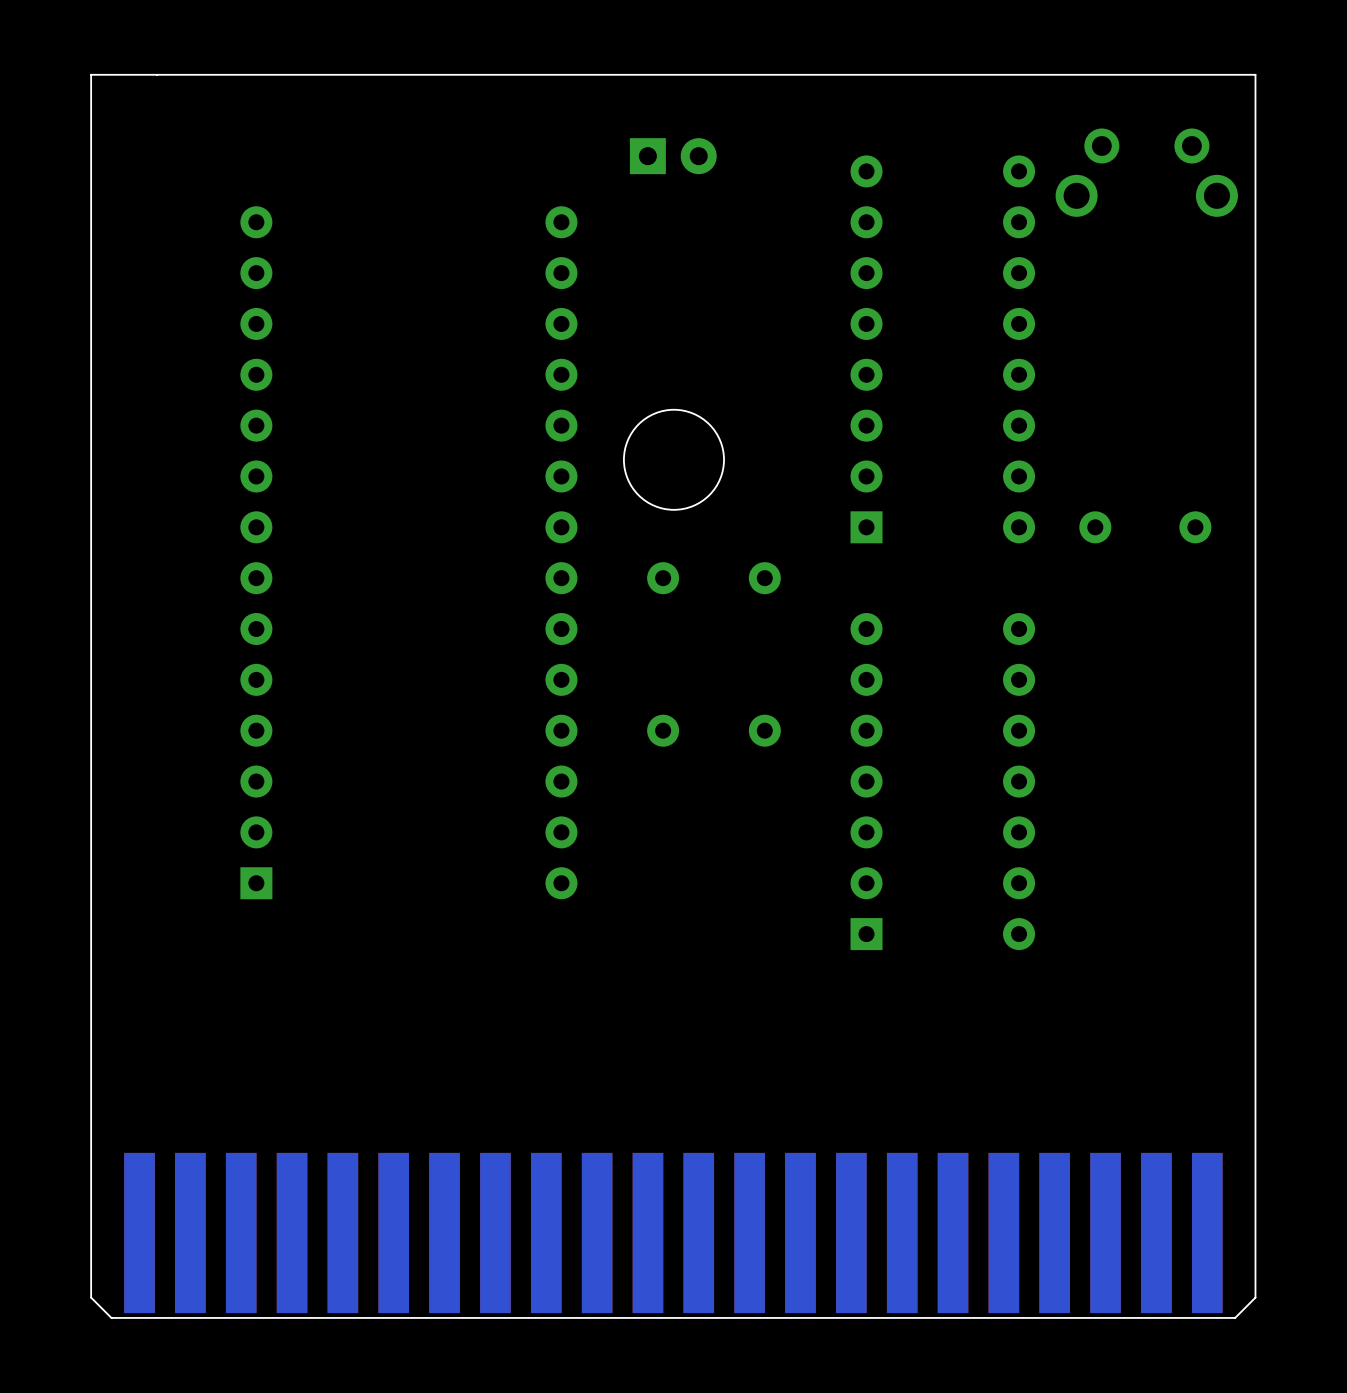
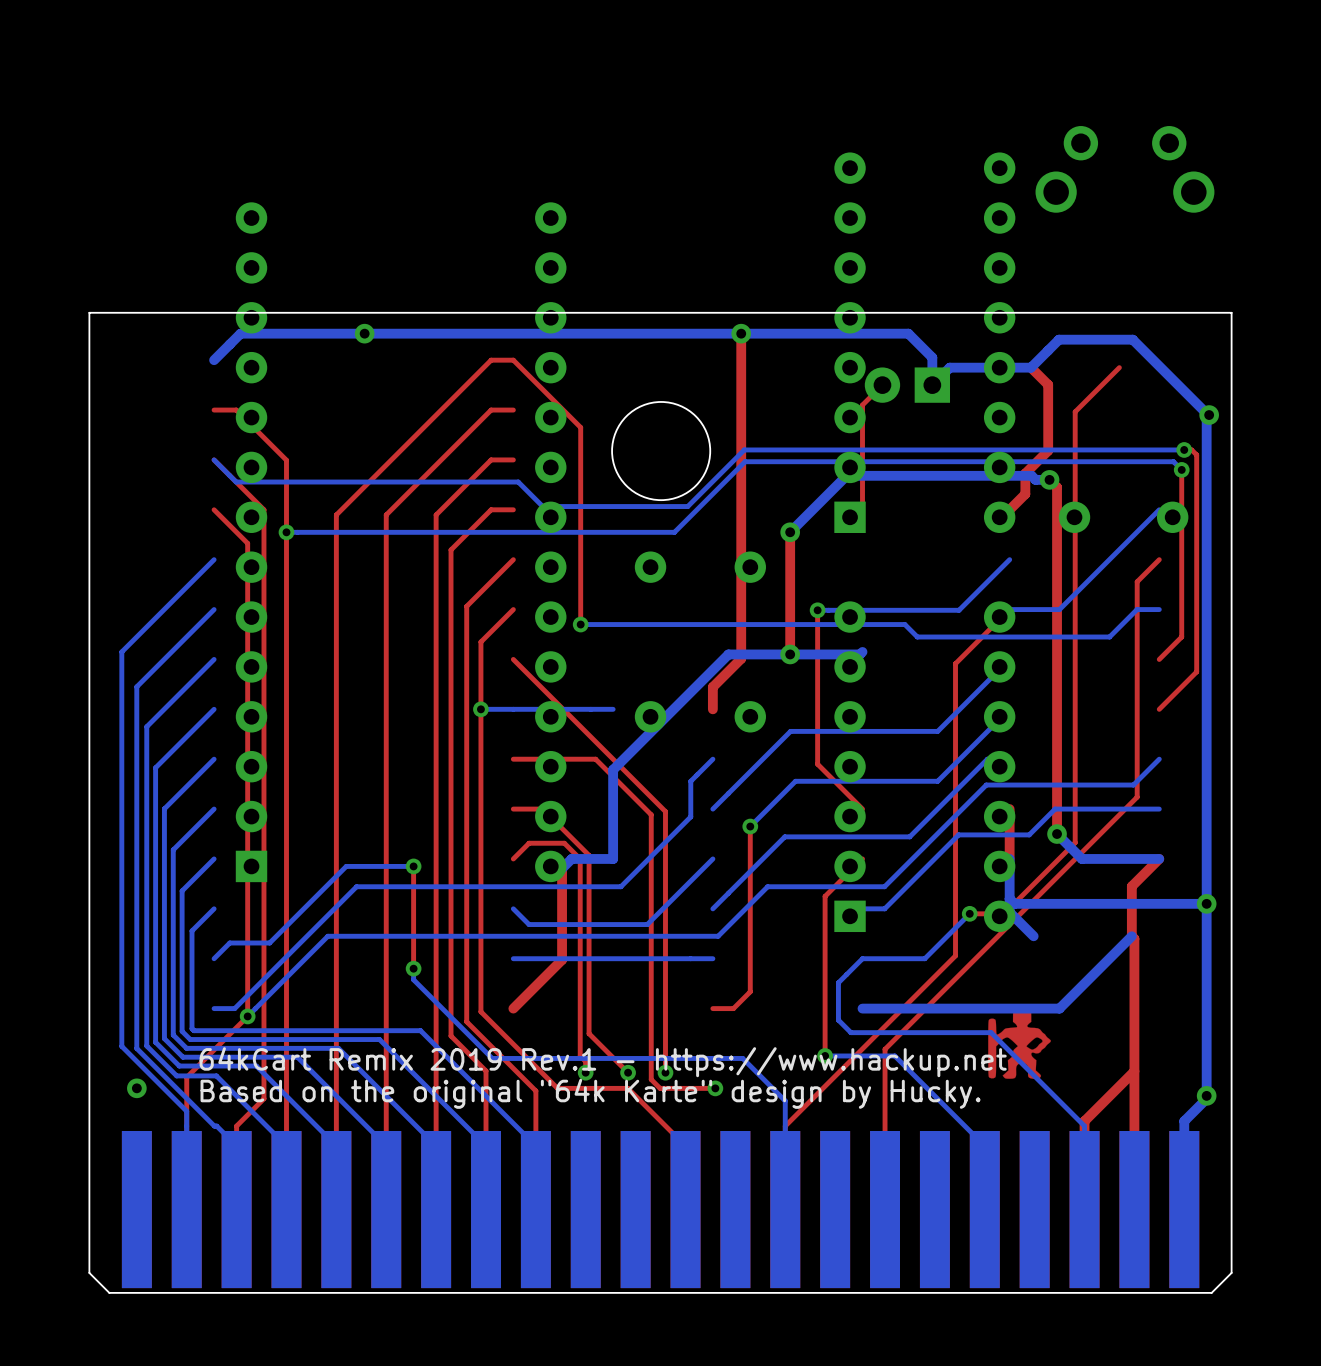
part rotation: 0° (673, 156) -> 180° (907, 385)
part position: (673, 156) -> (907, 385)
board edge: (1255, 318) (1255, 74) (91, 74) (91, 318) -> (1231, 312) (89, 312)
via: none -> (364, 333)
top track: none -> (741, 333) (741, 658) (712, 687) (712, 709)
via: none -> (741, 333)
bottom track: none -> (214, 360) (240, 333) (908, 333) (932, 357) (932, 385) (949, 367) (1031, 367) (1058, 339) (1132, 339) (1206, 413) (1206, 1098) (1184, 1121) (1184, 1209)
top track: none -> (1031, 367) (1048, 384) (1048, 450) (1025, 473) (1025, 494) (1009, 509)
top track: none -> (1119, 367) (1075, 411) (1075, 842) (1004, 913) (969, 913)
top track: none -> (882, 385) (862, 405) (862, 502)
top track: none -> (214, 410) (236, 410) (286, 460) (286, 1209)
top track: none -> (513, 410) (491, 410) (386, 514) (386, 1209)
via: none -> (1209, 415)
bottom track: none -> (1184, 449) (744, 449) (687, 506) (542, 506) (518, 482) (236, 482) (214, 459)
top track: none -> (1184, 449) (1191, 449) (1196, 454) (1196, 671) (1159, 709)
via: none -> (1184, 449)
top track: none -> (214, 459) (263, 509) (263, 1098) (236, 1126) (236, 1209)
top track: none -> (513, 459) (491, 459) (436, 514) (436, 1209)
bottom track: none -> (1181, 469) (1173, 461) (745, 461) (674, 532) (286, 532)
top track: none -> (1181, 469) (1181, 637) (1159, 659)
via: none -> (1181, 469)
bottom track: none -> (1049, 479) (1035, 479) (1031, 475) (846, 475) (790, 532)
top track: none -> (1049, 479) (1057, 487) (1057, 834)
via: none -> (1049, 479)
top track: none -> (214, 509) (247, 543) (247, 1016) (186, 1077) (186, 1209)
top track: none -> (513, 509) (491, 509) (451, 549) (451, 1036) (486, 1071) (486, 1209)
bottom track: none -> (1159, 509) (1059, 609) (1009, 609)
via: none -> (286, 532)
top track: none -> (790, 532) (790, 654)
via: none -> (790, 532)
bottom track: none -> (214, 559) (121, 651) (121, 1046) (186, 1111) (186, 1209)
top track: none -> (513, 559) (466, 606) (466, 1021) (535, 1090) (535, 1209)
bottom track: none -> (1009, 559) (959, 610) (817, 610)
top track: none -> (1159, 559) (1137, 581) (1137, 797) (885, 1049) (885, 1209)
bottom track: none -> (214, 609) (136, 686) (136, 1048) (236, 1145) (236, 1209)
top track: none -> (513, 609) (480, 641) (480, 1011) (557, 1088) (627, 1088) (685, 1145) (685, 1209)
top track: none -> (1009, 609) (955, 663) (955, 955) (785, 1126) (785, 1209)
bottom track: none -> (1159, 609) (1137, 609) (1109, 637) (917, 637) (904, 624) (580, 624)
top track: none -> (817, 610) (817, 764) (862, 809)
via: none -> (817, 610)
top track: none -> (580, 624) (580, 427) (513, 360) (491, 360) (336, 514) (336, 1209)
via: none -> (580, 624)
bottom track: none -> (862, 651) (860, 654) (728, 654) (613, 769) (613, 858) (571, 858) (562, 868)
via: none -> (790, 654)
bottom track: none -> (214, 659) (146, 726) (146, 1045) (176, 1075) (216, 1075) (286, 1145) (286, 1209)
top track: none -> (513, 659) (665, 811) (665, 1072)
bottom track: none -> (1009, 659) (937, 731) (790, 731) (712, 809)
bottom track: none -> (214, 709) (155, 767) (155, 1042) (179, 1066) (256, 1066) (336, 1145) (336, 1209)
via: none -> (480, 709)
bottom track: none -> (613, 709) (480, 709)
bottom track: none -> (1009, 709) (937, 781) (795, 781) (750, 826)
bottom track: none -> (214, 759) (164, 808) (164, 1038) (182, 1057) (297, 1057) (386, 1145) (386, 1209)
top track: none -> (513, 759) (595, 759) (651, 814) (651, 1079) (660, 1088) (715, 1088)
bottom track: none -> (712, 759) (690, 781) (690, 816) (620, 886) (356, 886) (234, 1008) (214, 1008)
bottom track: none -> (1009, 759) (987, 759) (909, 836) (784, 836) (712, 908)
bottom track: none -> (1159, 759) (1133, 785) (986, 785) (884, 886) (767, 886) (718, 936) (327, 936) (247, 1016)
bottom track: none -> (214, 809) (173, 849) (173, 1034) (186, 1048) (338, 1048) (436, 1145) (436, 1209)
top track: none -> (513, 809) (542, 809) (589, 855) (589, 1033) (628, 1072)
top track: none -> (1009, 809) (1009, 858)
bottom track: none -> (1159, 809) (1055, 809) (1029, 834) (958, 834) (884, 908) (862, 908)
top track: none -> (750, 826) (750, 991) (733, 1008) (712, 1008)
via: none -> (750, 826)
bottom track: none -> (1057, 834) (1081, 858) (1159, 858)
via: none -> (1057, 834)
bottom track: none -> (214, 858) (182, 890) (182, 1031) (190, 1039) (379, 1039) (486, 1145) (486, 1209)
top track: none -> (513, 858) (529, 843) (564, 843) (580, 859) (580, 1056) (585, 1061) (585, 1072)
bottom track: none -> (712, 858) (647, 924) (529, 924) (513, 908)
top track: none -> (862, 858) (825, 896) (825, 1055)
bottom track: none -> (1009, 858) (1009, 912) (1033, 936)
top track: none -> (1159, 858) (1131, 886) (1131, 936) (1134, 938) (1134, 1209)
bottom track: none -> (413, 866) (346, 866) (269, 943) (229, 943) (214, 958)
top track: none -> (413, 866) (413, 968)
via: none -> (413, 866)
top track: none -> (562, 868) (562, 959) (513, 1008)
bottom track: none -> (1009, 898) (1014, 903) (1206, 903)
via: none -> (1206, 903)
bottom track: none -> (214, 908) (192, 930) (192, 1028) (193, 1030) (420, 1030) (535, 1145) (535, 1209)
bottom track: none -> (969, 913) (924, 958) (862, 958) (838, 982) (838, 1020) (850, 1032) (991, 1032) (1084, 1126) (1084, 1209)
via: none -> (969, 913)
bottom track: none -> (1131, 936) (1059, 1008) (862, 1008)
bottom track: none -> (712, 958) (513, 958)
bottom track: none -> (413, 968) (413, 979) (492, 1058) (742, 1058) (785, 1100) (785, 1209)
via: none -> (413, 968)
drawing: none -> [988, 1008, 1051, 1080]
via: none -> (247, 1016)
bottom track: none -> (825, 1055) (894, 1055) (984, 1145) (984, 1209)
via: none -> (825, 1055)
text: none -> 64kCart Remix 2019 Rev.1 - https://www.hackup.net (603, 1062)
top track: none -> (1134, 1071) (1084, 1121) (1084, 1209)
via: none -> (585, 1072)
via: none -> (628, 1072)
via: none -> (665, 1072)
via: none -> (136, 1088)
via: none -> (715, 1088)
text: none -> Based on the original "64k Karte" design by Hucky. (590, 1093)
via: none -> (1206, 1095)

